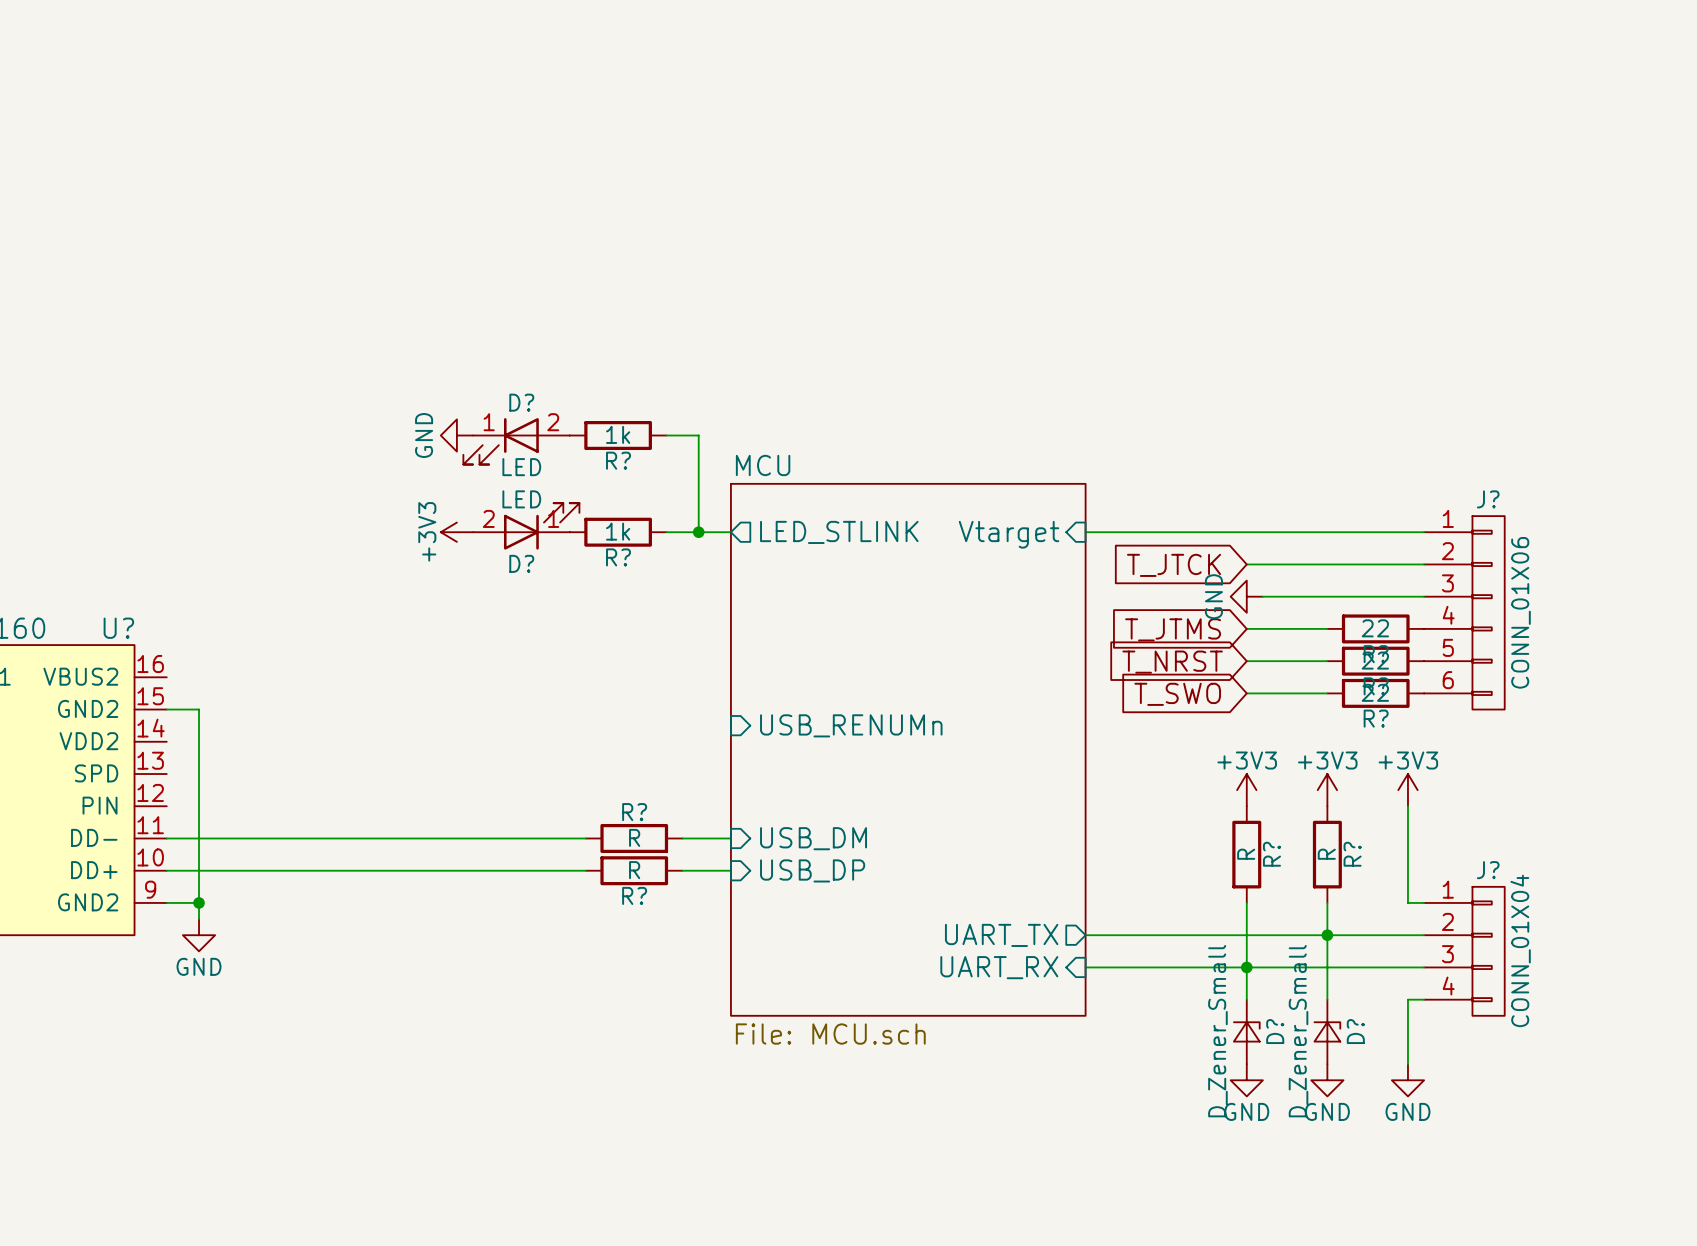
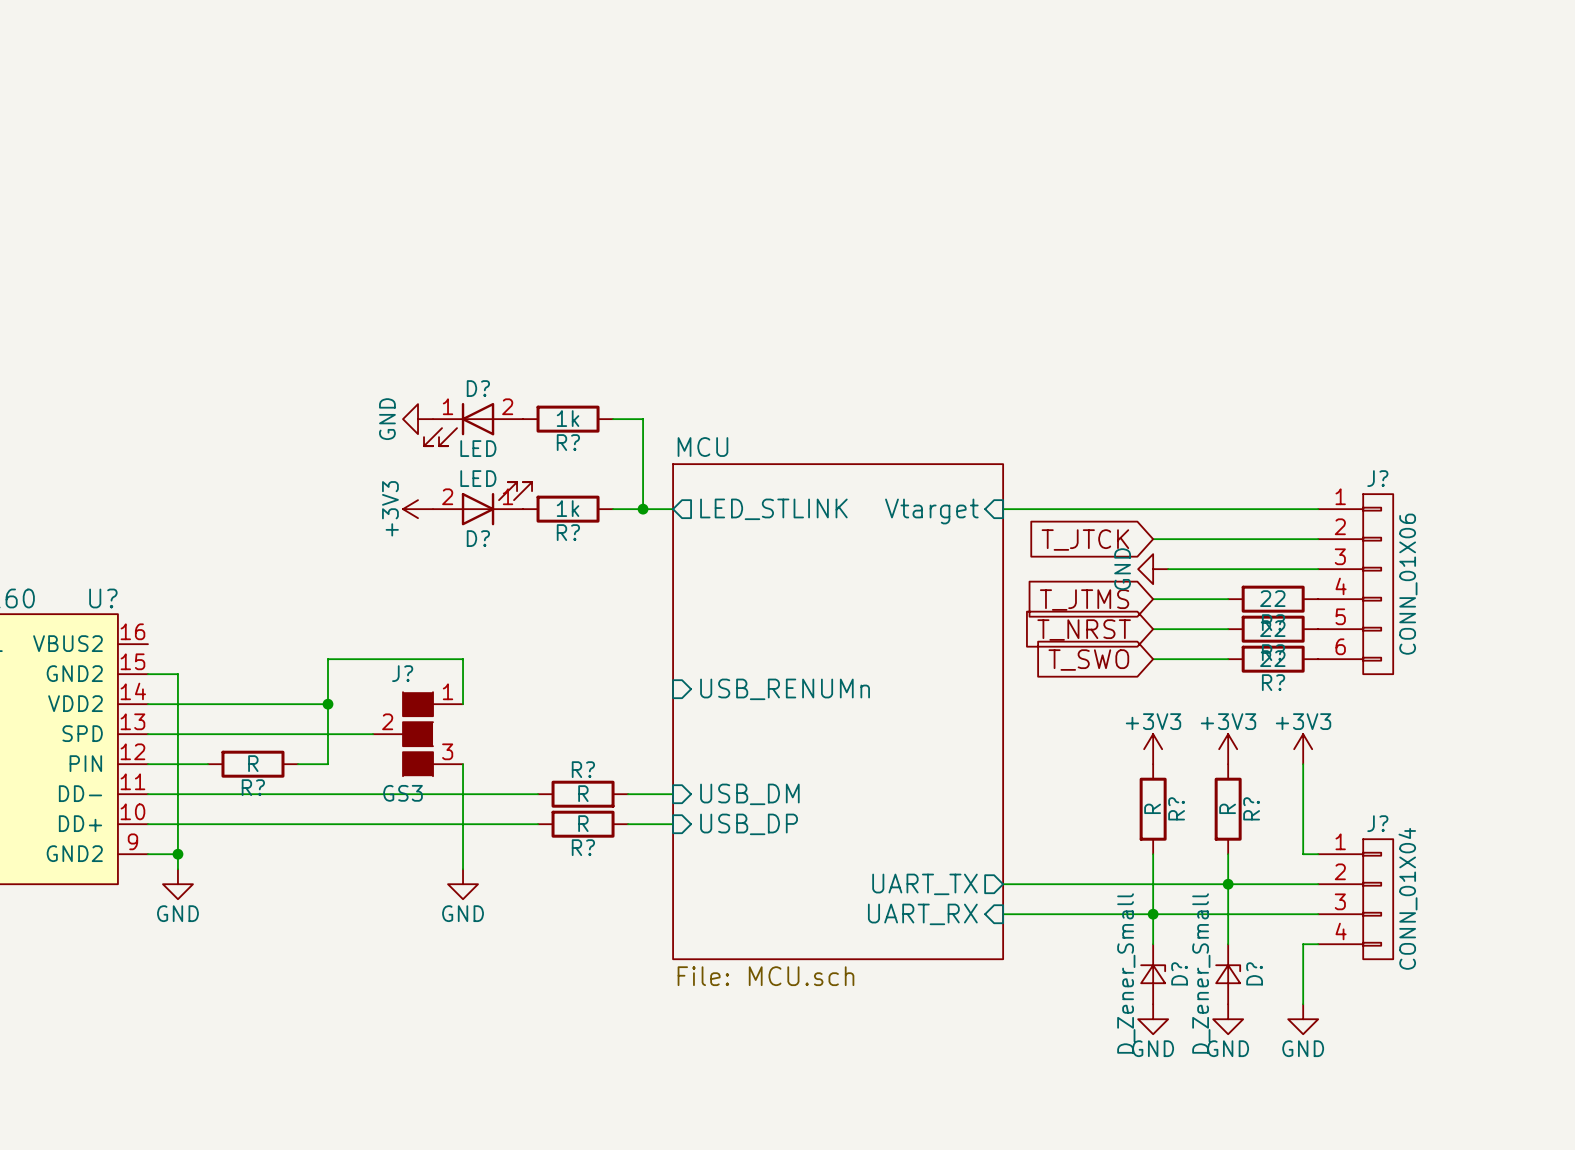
wire: none -> (147, 704) (327, 704)
junction: none -> (327, 704)
wire: none -> (463, 704) (463, 659) (327, 659) (327, 764) (297, 764)
wire: none -> (147, 734) (373, 734)
J?: none -> GS3 (418, 734)
wire: none -> (147, 764) (207, 764)
R?: none -> R (252, 764)
wire: none -> (463, 764) (463, 869)
power symbol: none -> GND (463, 884)

